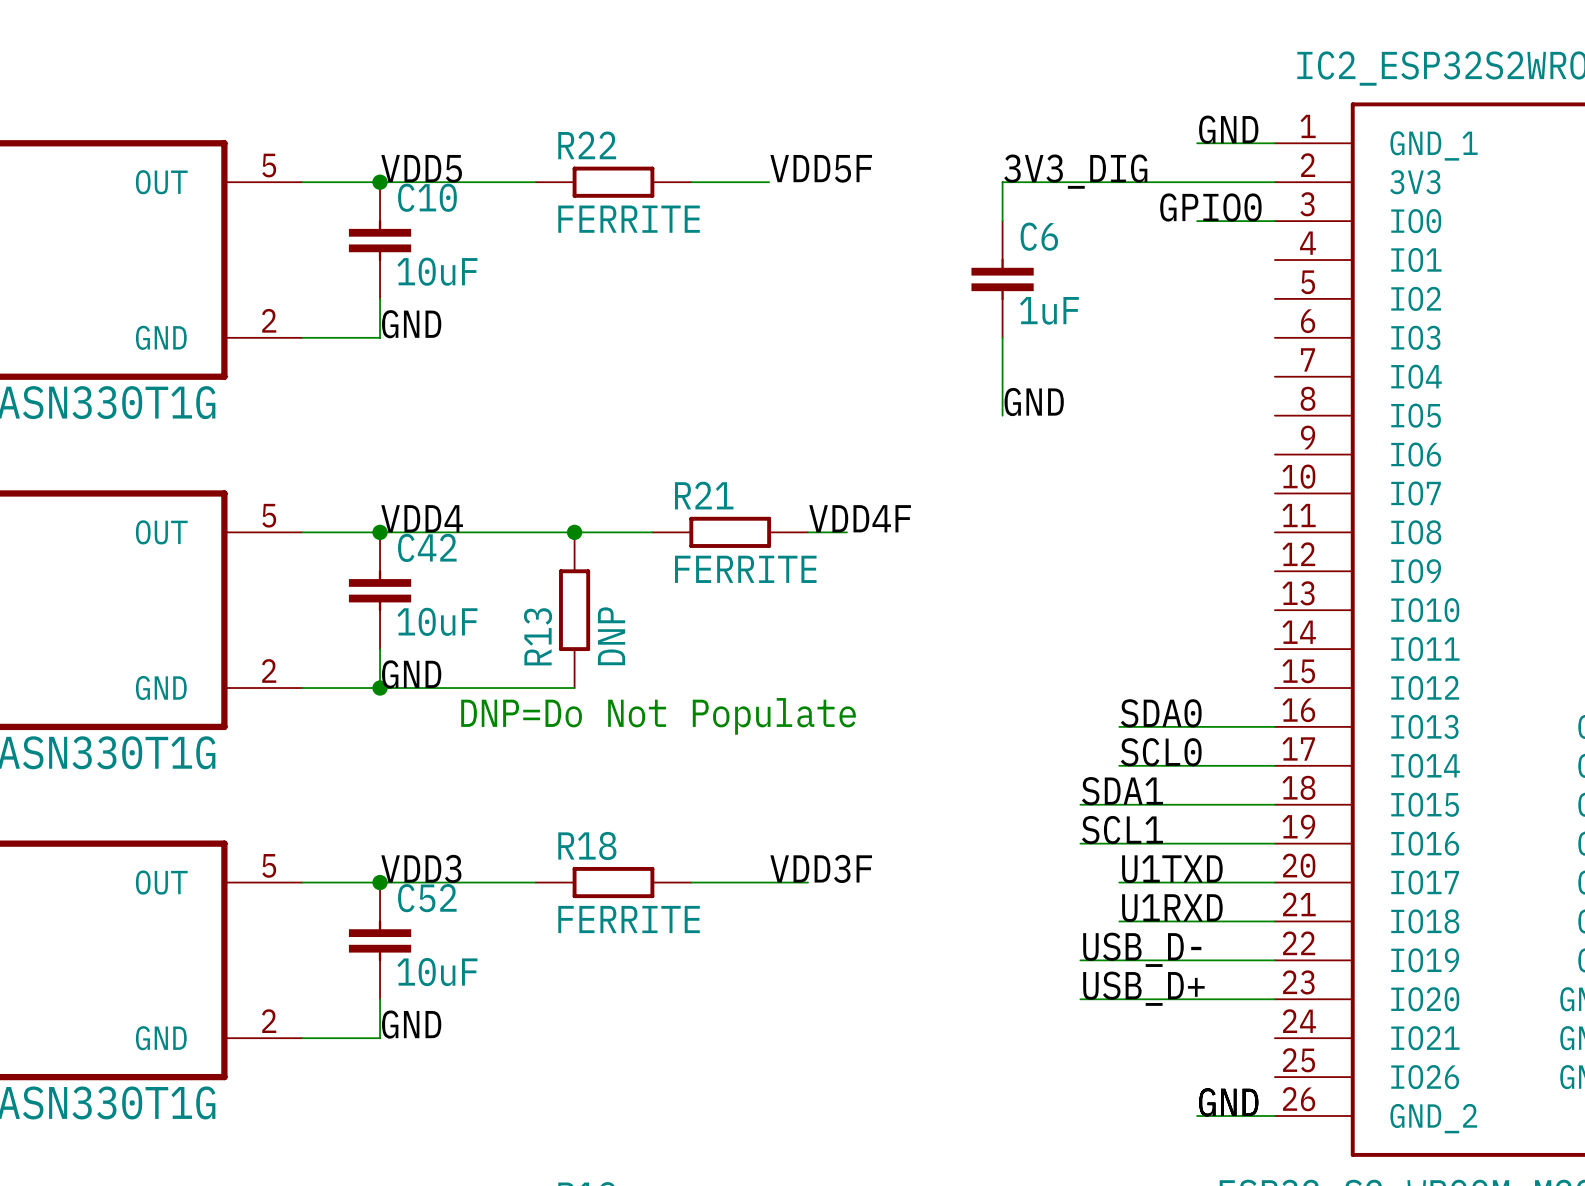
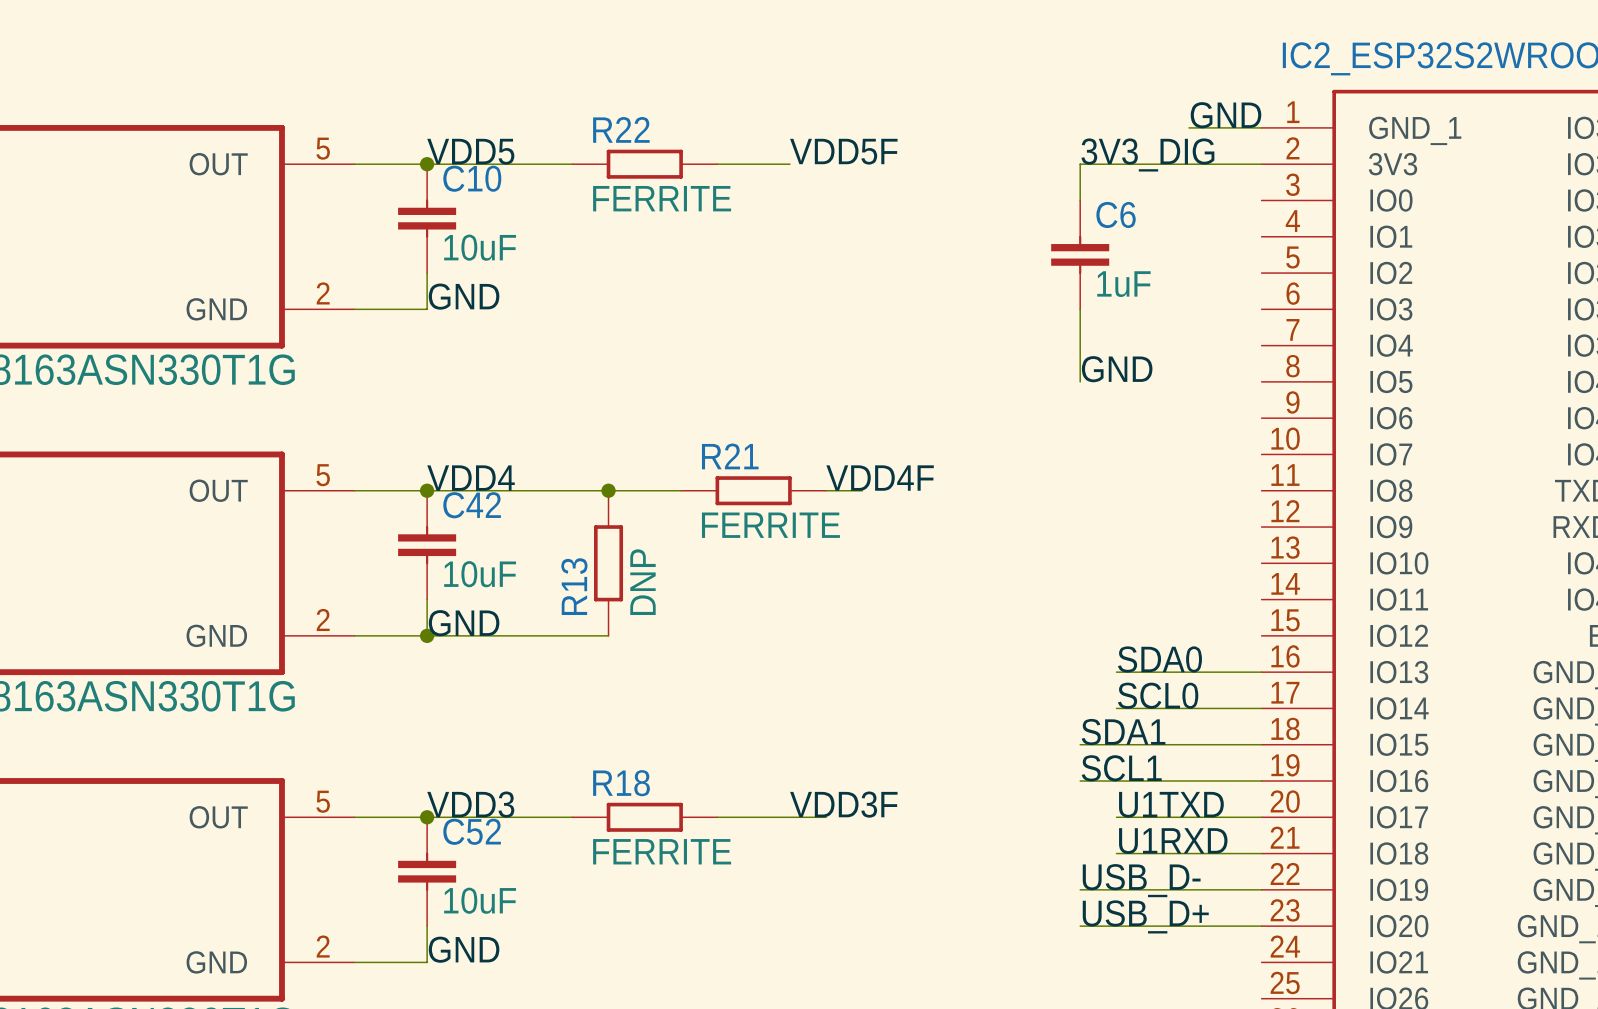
label position: 3V3_DIG (1075, 171) -> 3V3_DIG (1147, 154)
wire: (1080, 182) (1002, 182) (1002, 221) -> (1080, 164) (1080, 200)
label: GPIO0 (1210, 207) -> none
wire: (1197, 221) (1274, 221) -> none
C6 position: (1002, 279) -> (1080, 254)
wire: (1002, 337) (1002, 415) -> (1080, 309) (1080, 381)
label position: GND (1034, 402) -> GND (1117, 369)
text: DNP=Do Not Populate (658, 716) -> none

